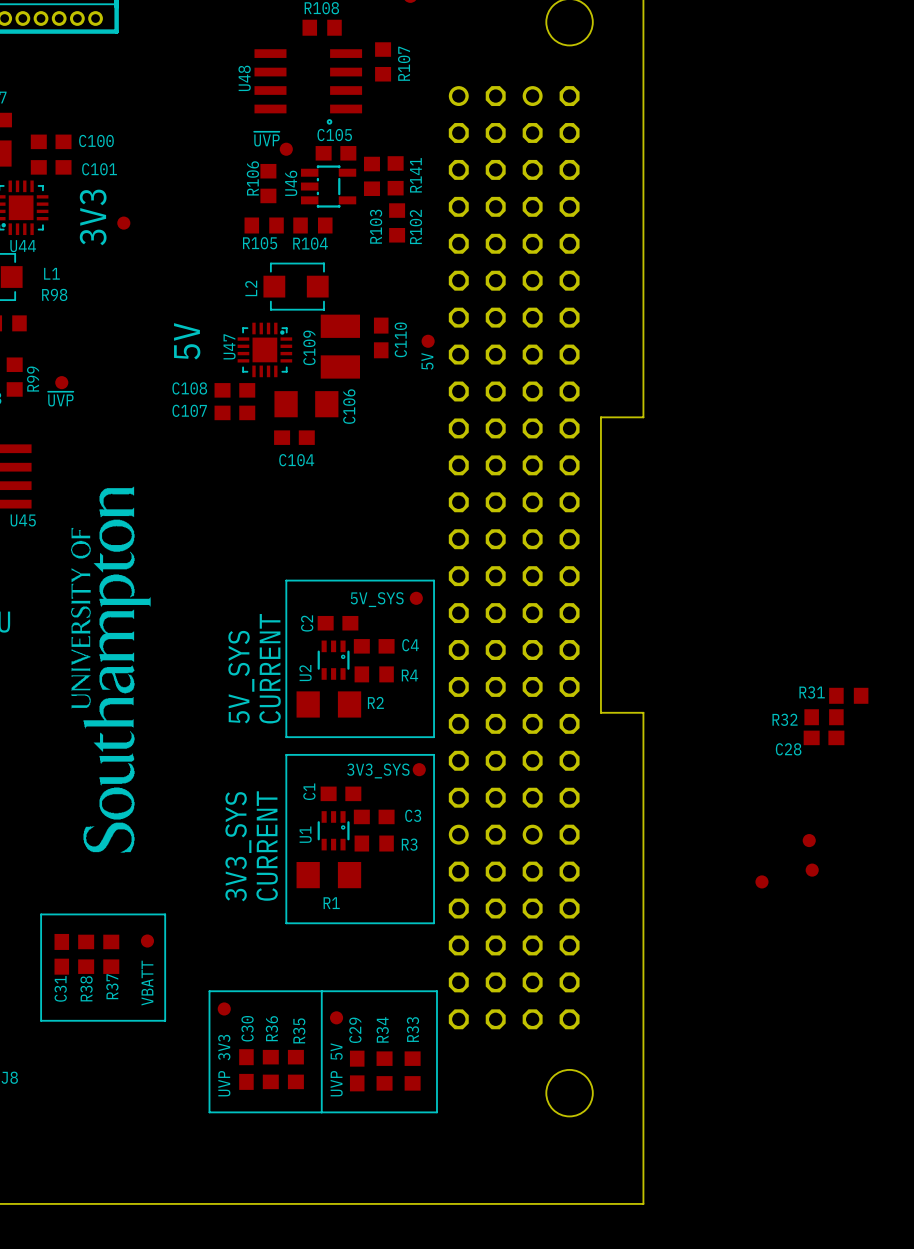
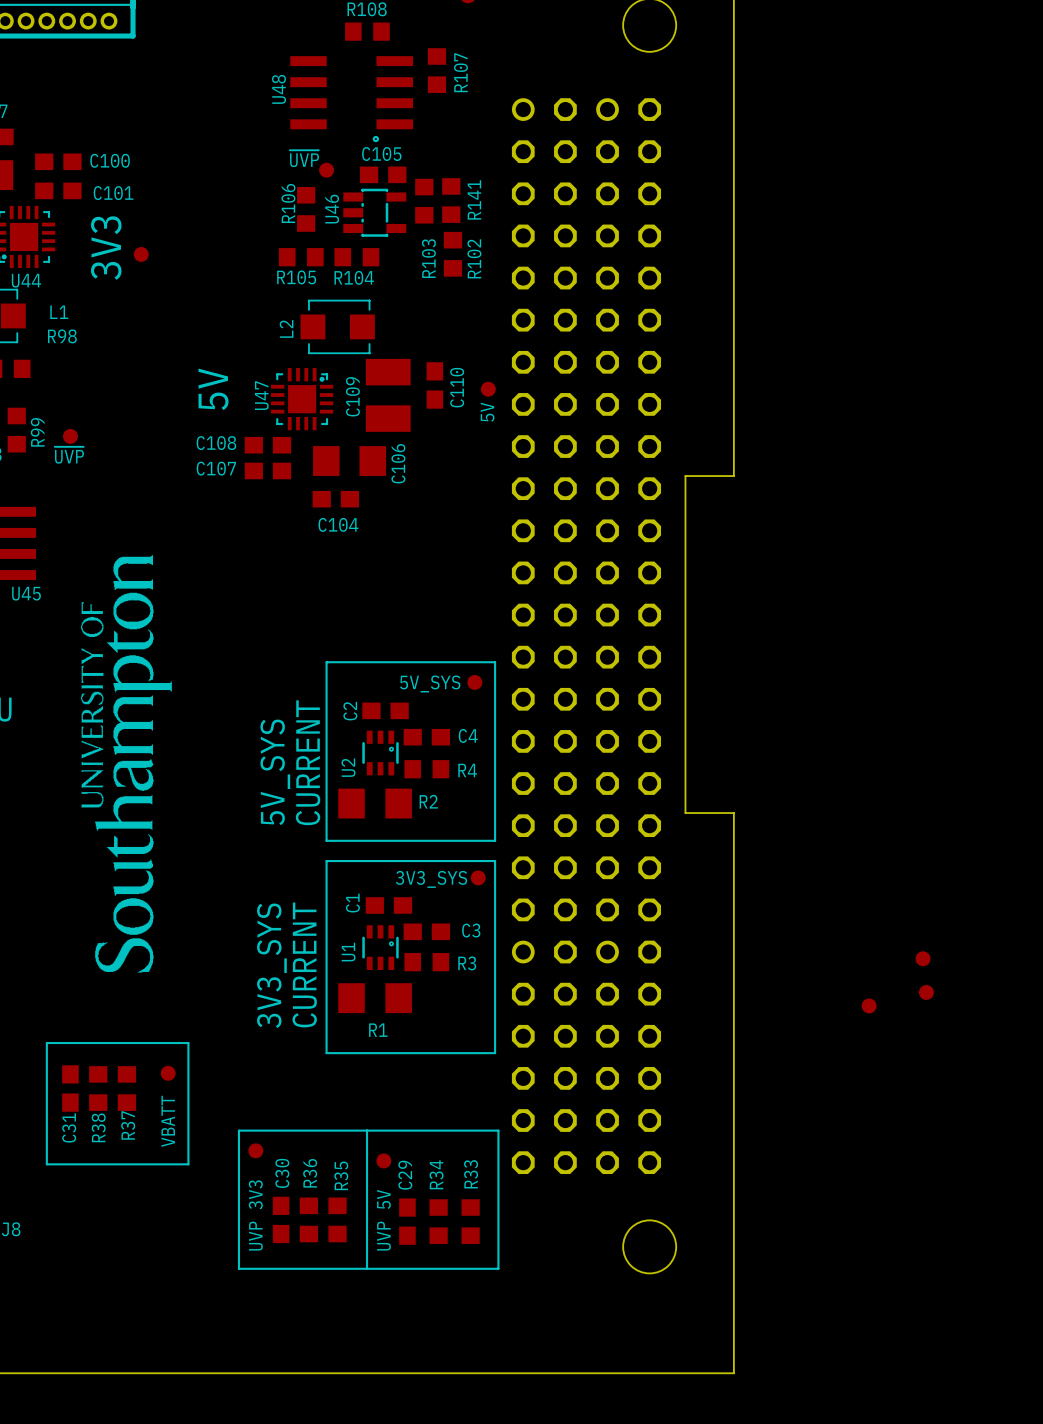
R31: (848, 695) -> none
R32: (824, 717) -> none
C28: (824, 737) -> none

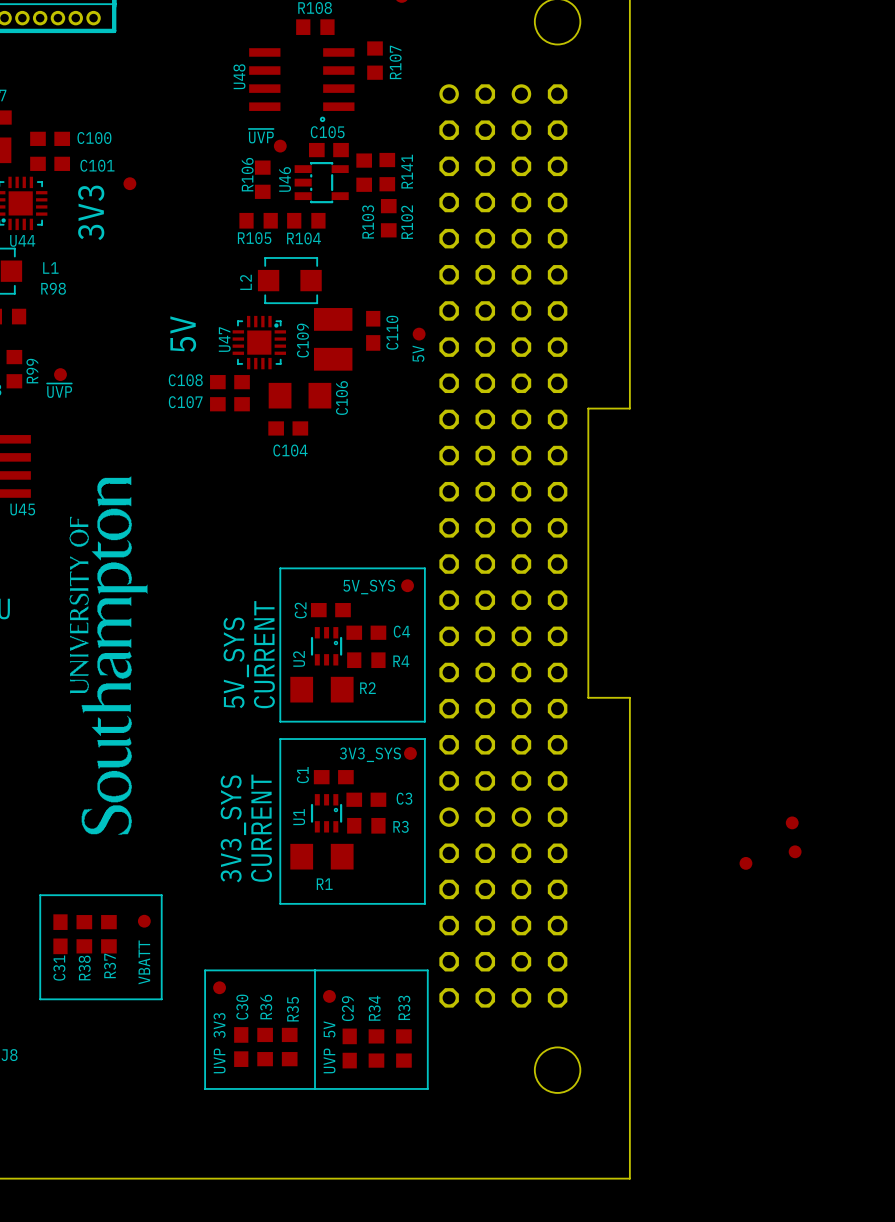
part position: (141, 254) -> (129, 183)

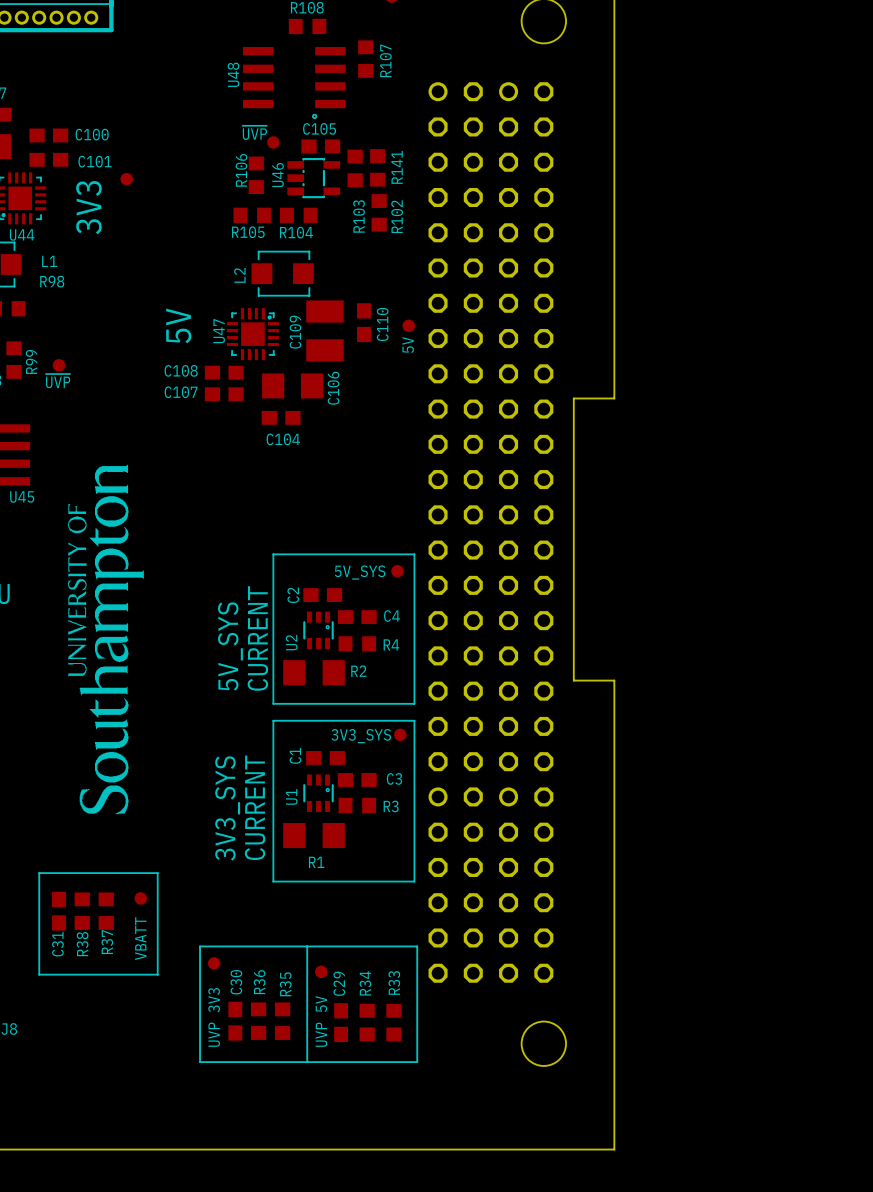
part: (792, 822) -> none
part: (795, 851) -> none
part: (745, 863) -> none

